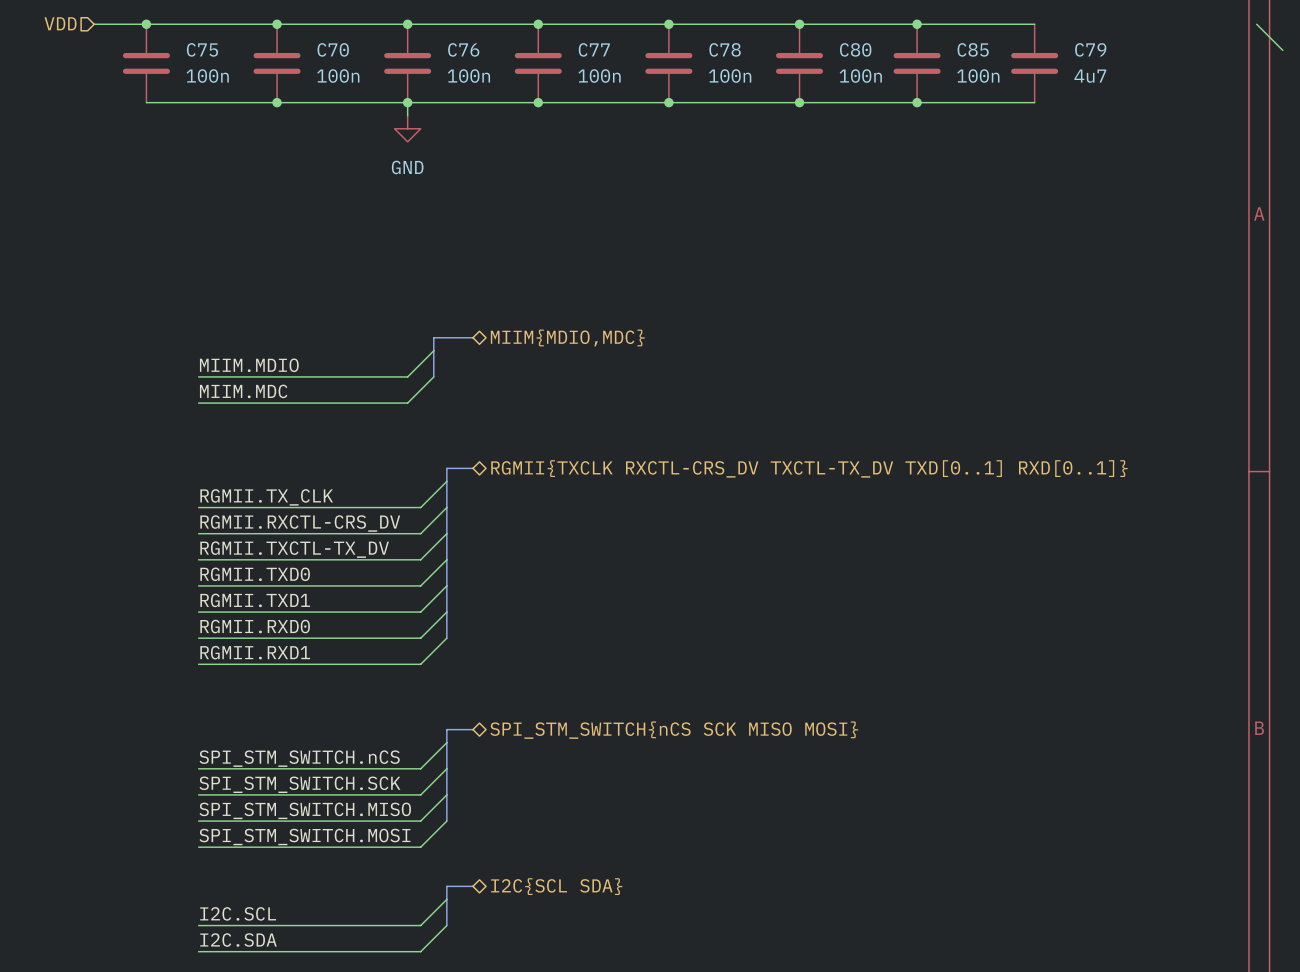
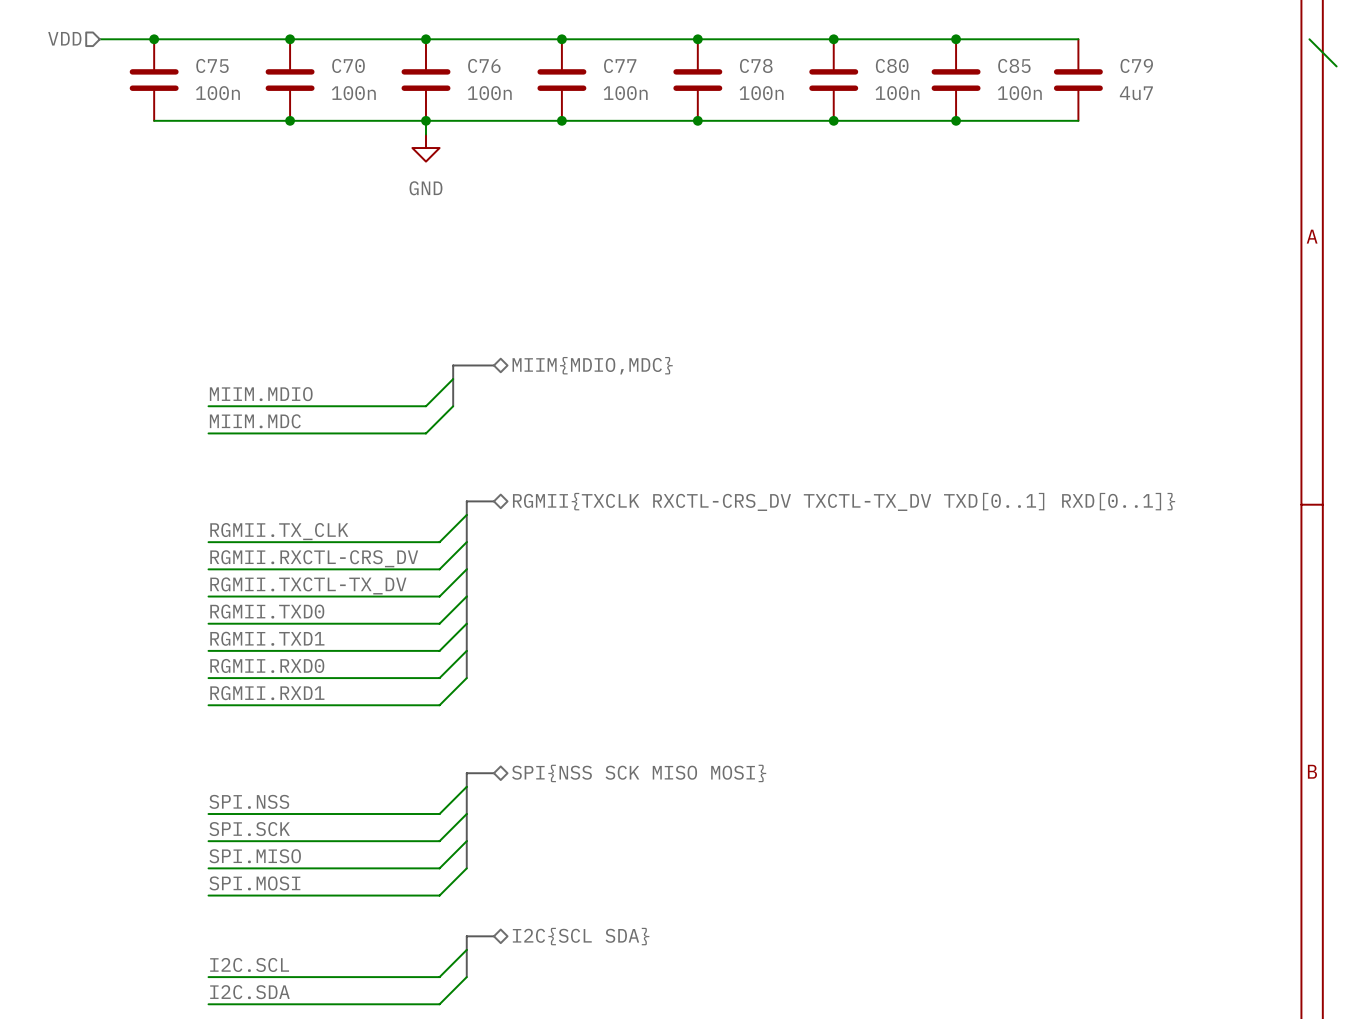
hierarchical label: SPI_STM_SWITCH{nCS SCK MISO MOSI} (674, 730) -> SPI{NSS SCK MISO MOSI} (639, 773)
label: SPI_STM_SWITCH.nCS (299, 758) -> SPI.NSS (249, 801)
label: SPI_STM_SWITCH.SCK (299, 784) -> SPI.SCK (249, 829)
label: SPI_STM_SWITCH.MISO (305, 810) -> SPI.MISO (255, 856)
label: SPI_STM_SWITCH.MOSI (304, 837) -> SPI.MOSI (254, 883)

